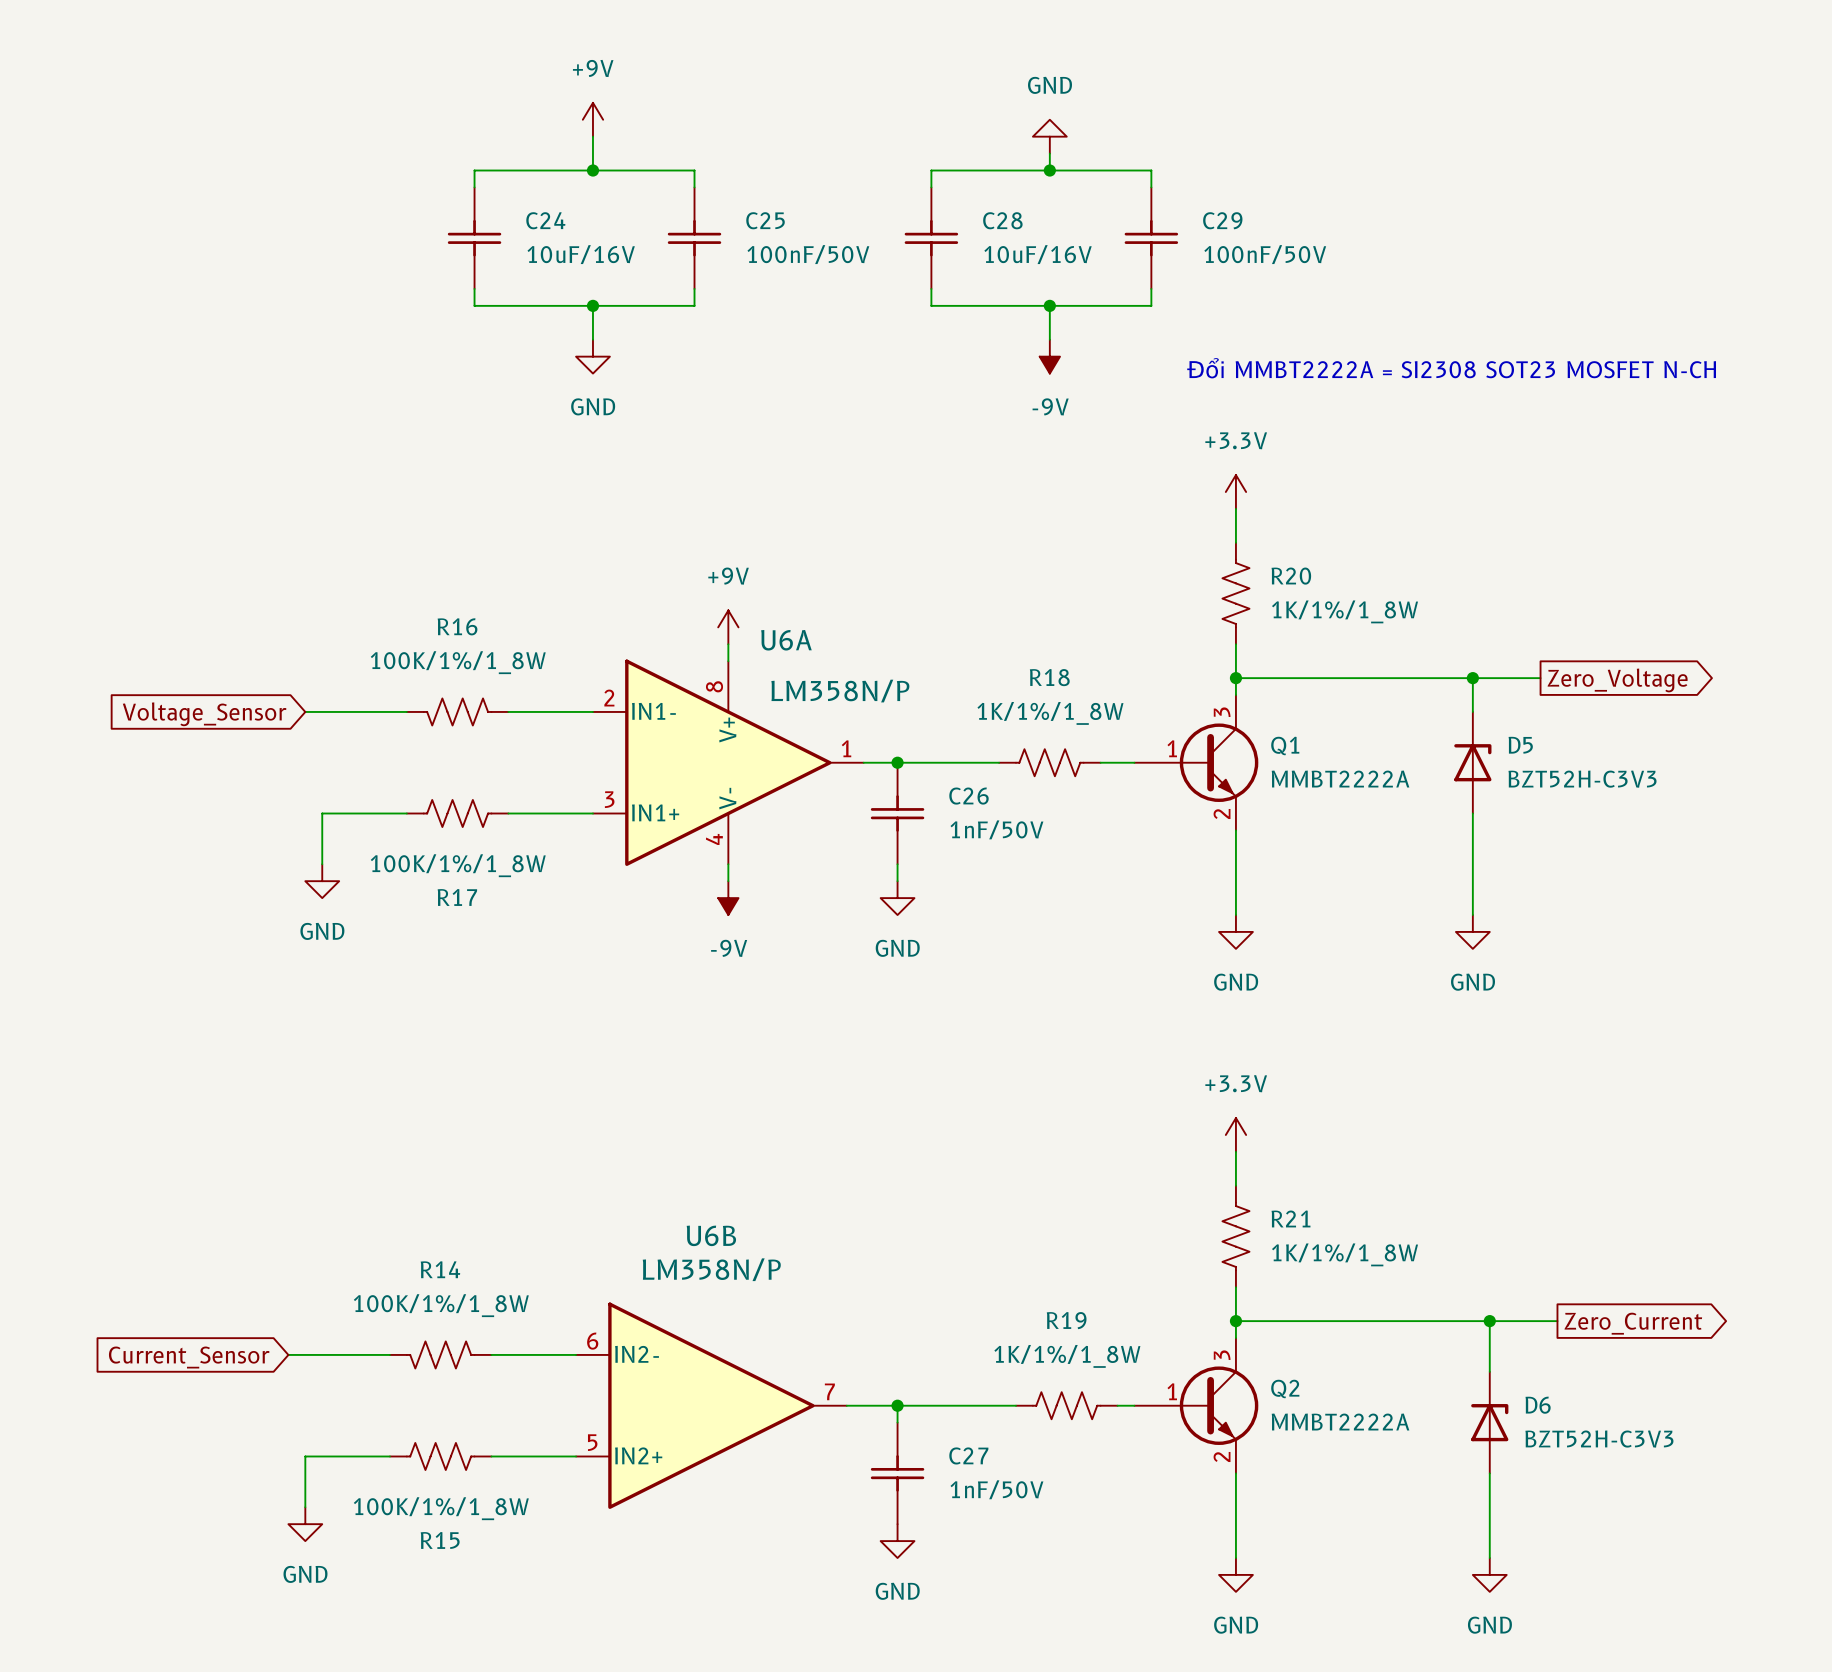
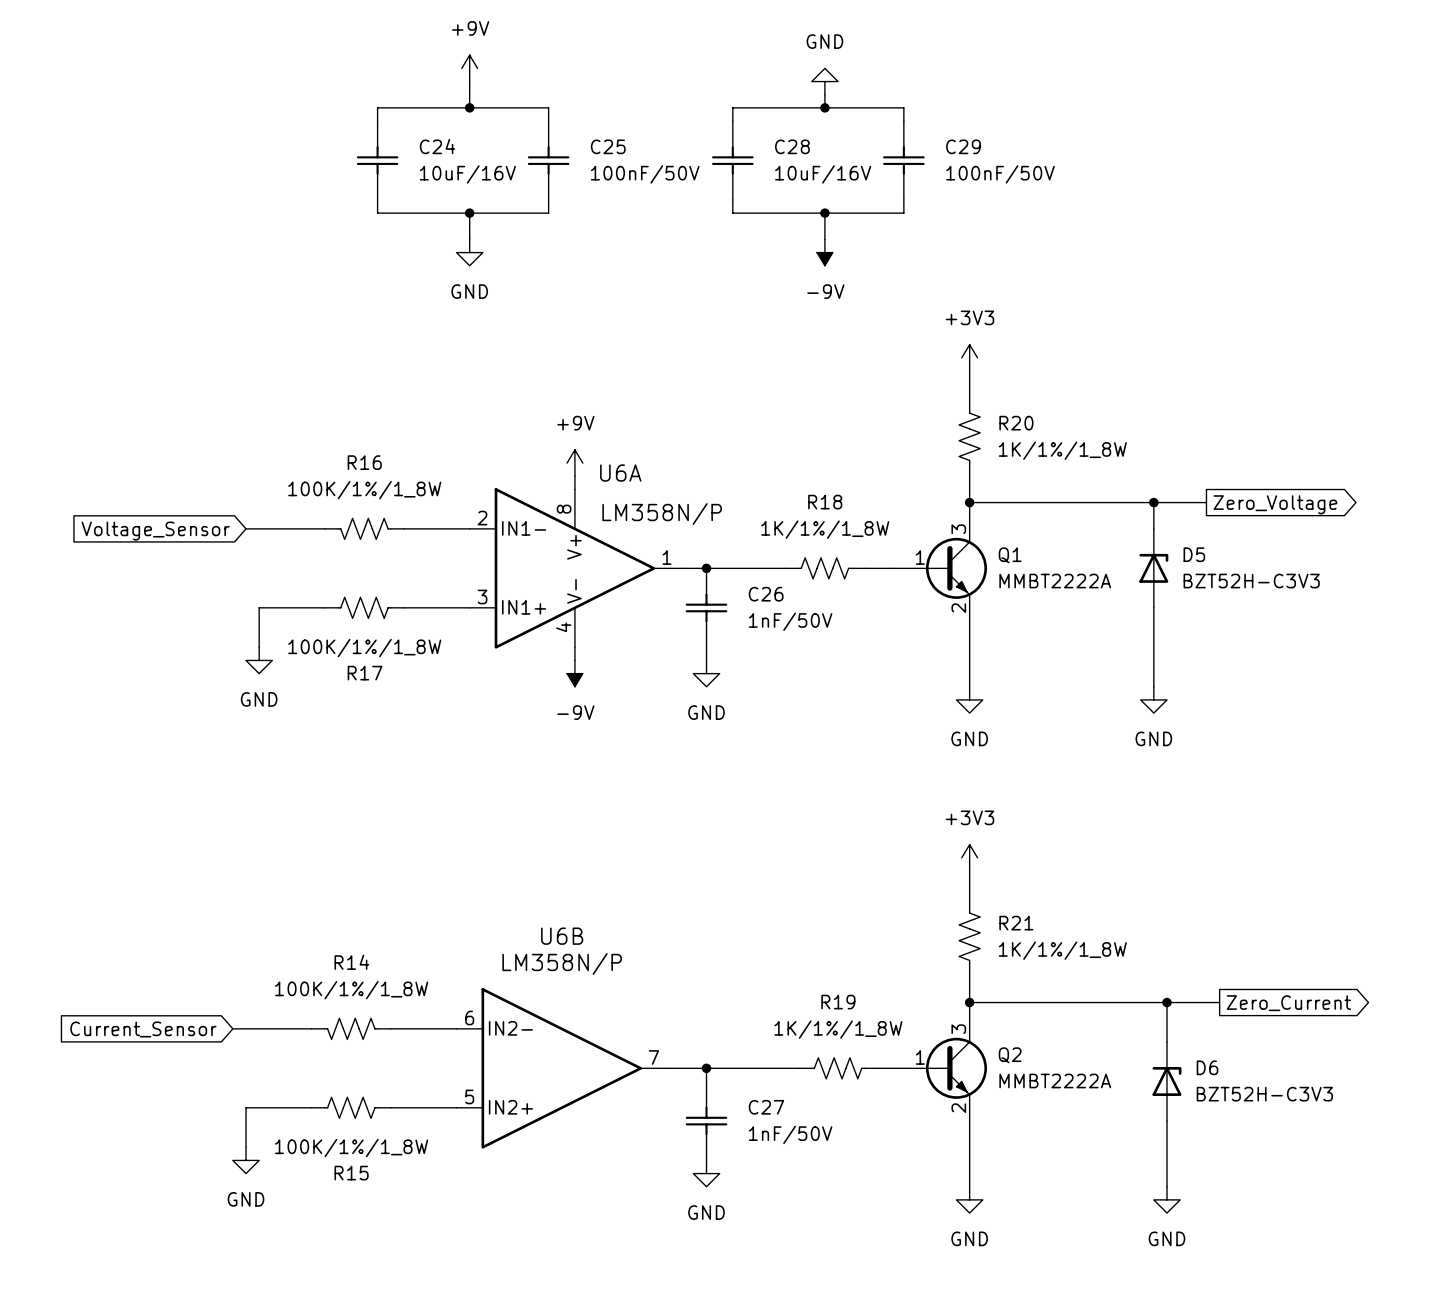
text: Đổi MMBT2222A = SI2308 SOT23 MOSFET N-CH (1451, 368) -> none
power symbol: +3.3V (1235, 492) -> +3V3 (969, 357)
power symbol: +3.3V (1235, 1134) -> +3V3 (969, 857)

